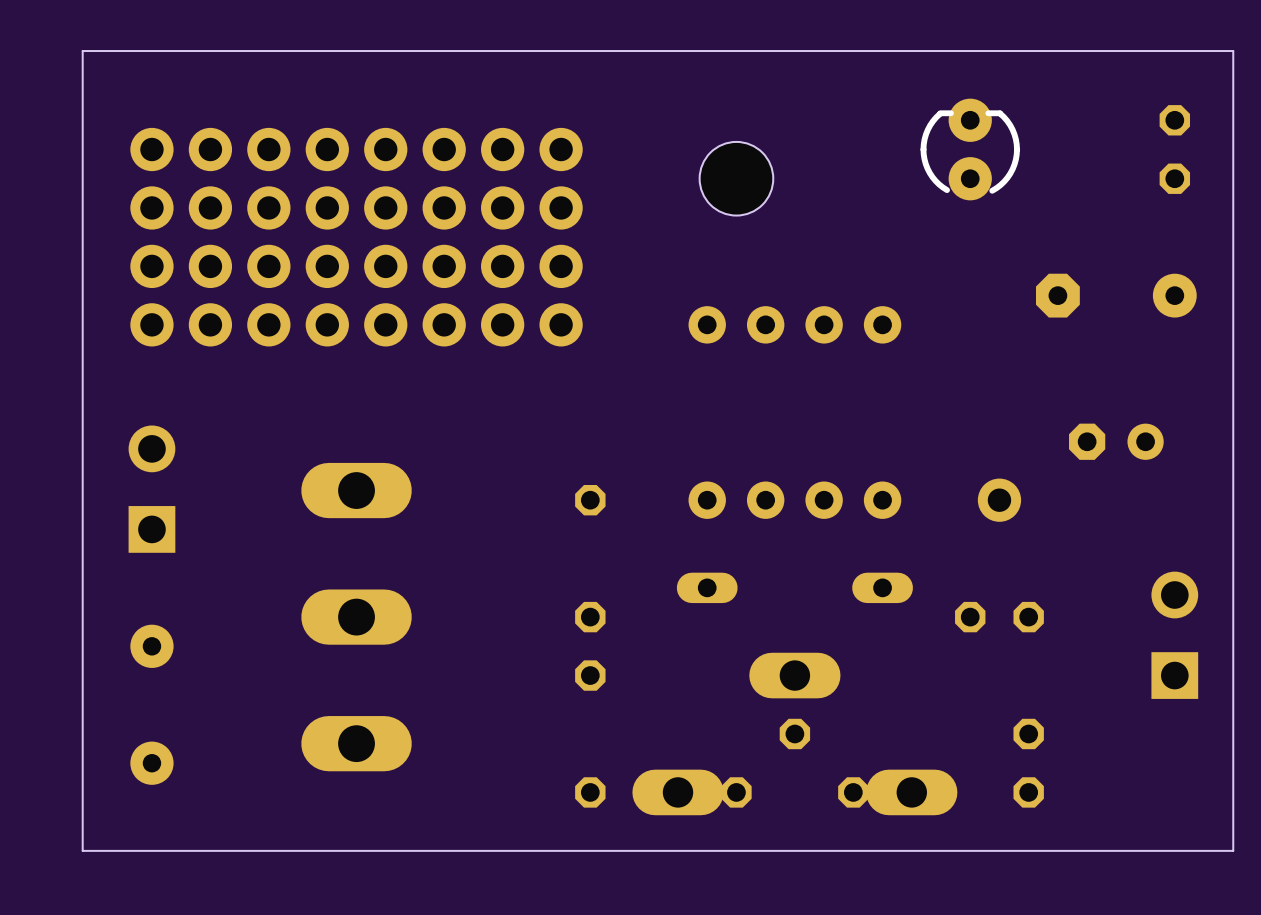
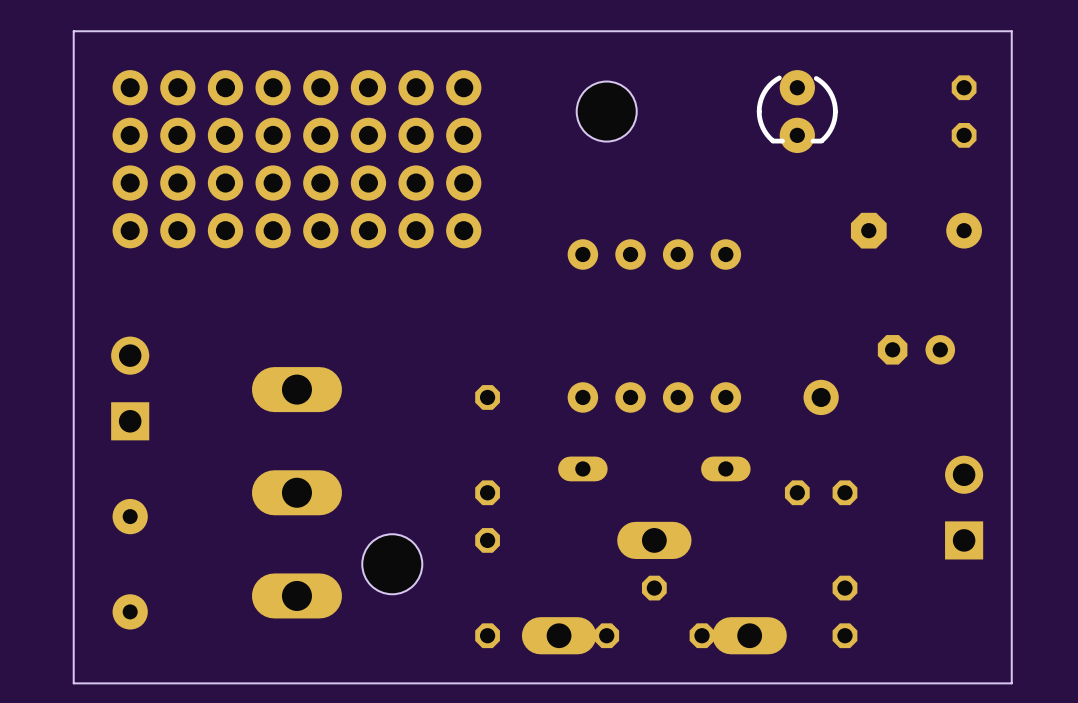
part: none -> (296, 87)
part: (356, 149) -> none
hole: none -> (606, 111)
part rotation: 0° (970, 149) -> 180° (797, 111)
part: none -> (296, 135)
part: (736, 178) -> none
part: (356, 207) -> none
part: none -> (296, 183)
part: (356, 266) -> none
part: none -> (296, 230)
part: (356, 324) -> none
hole: none -> (392, 564)

